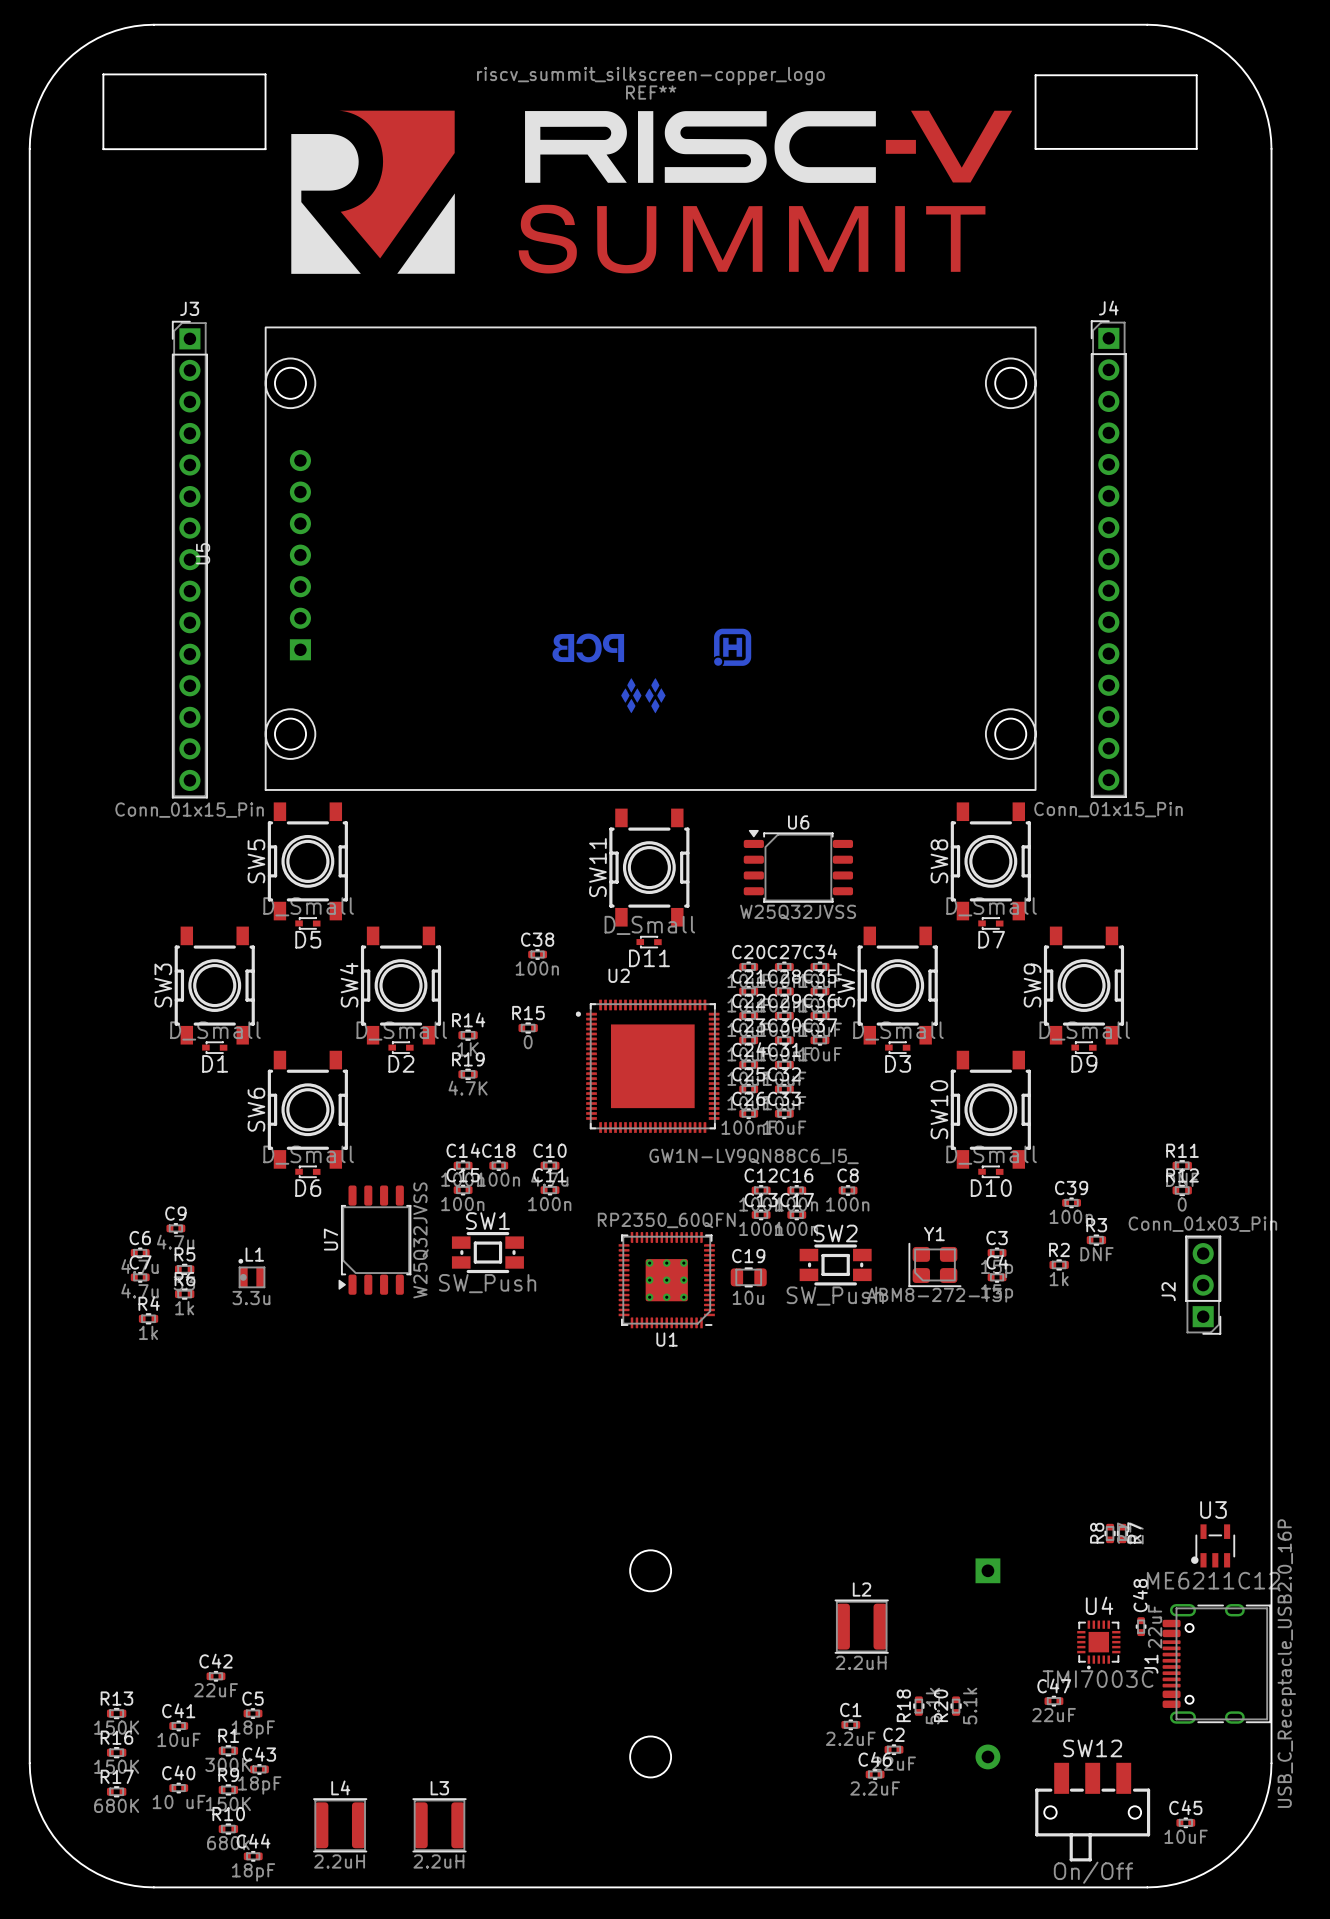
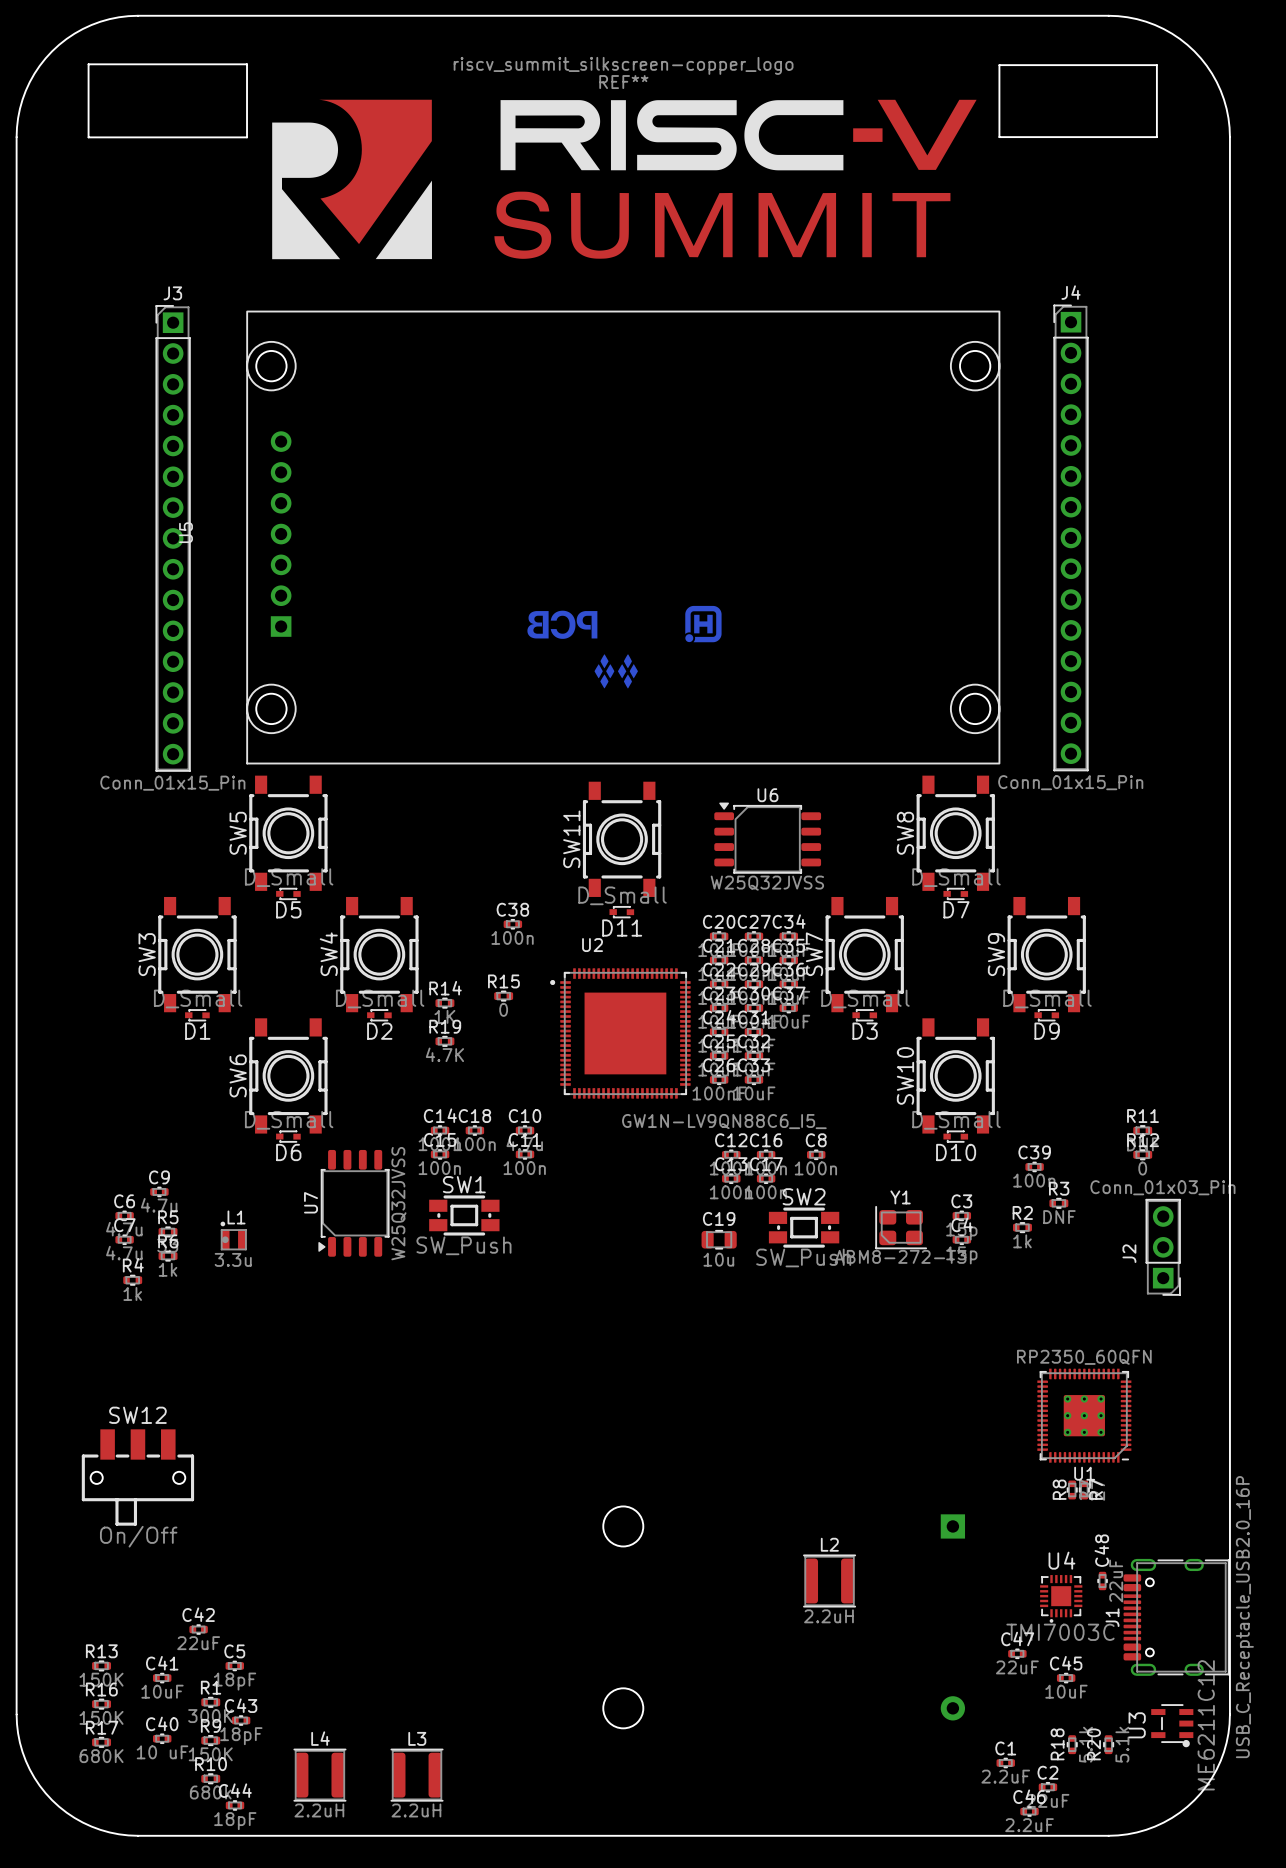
U1 position: (666, 1280) -> (1084, 1415)
U3 rotation: 0° (1213, 1545) -> 90° counterclockwise (1172, 1725)
U3 position: (1213, 1545) -> (1172, 1725)
R18 position: (918, 1706) -> (1072, 1744)
R20 position: (956, 1706) -> (1108, 1744)
C1 position: (850, 1724) -> (1005, 1763)
C2 position: (894, 1749) -> (1047, 1787)
C46 position: (875, 1774) -> (1029, 1811)
SW12 position: (1092, 1812) -> (137, 1477)
C45 position: (1185, 1822) -> (1066, 1678)

